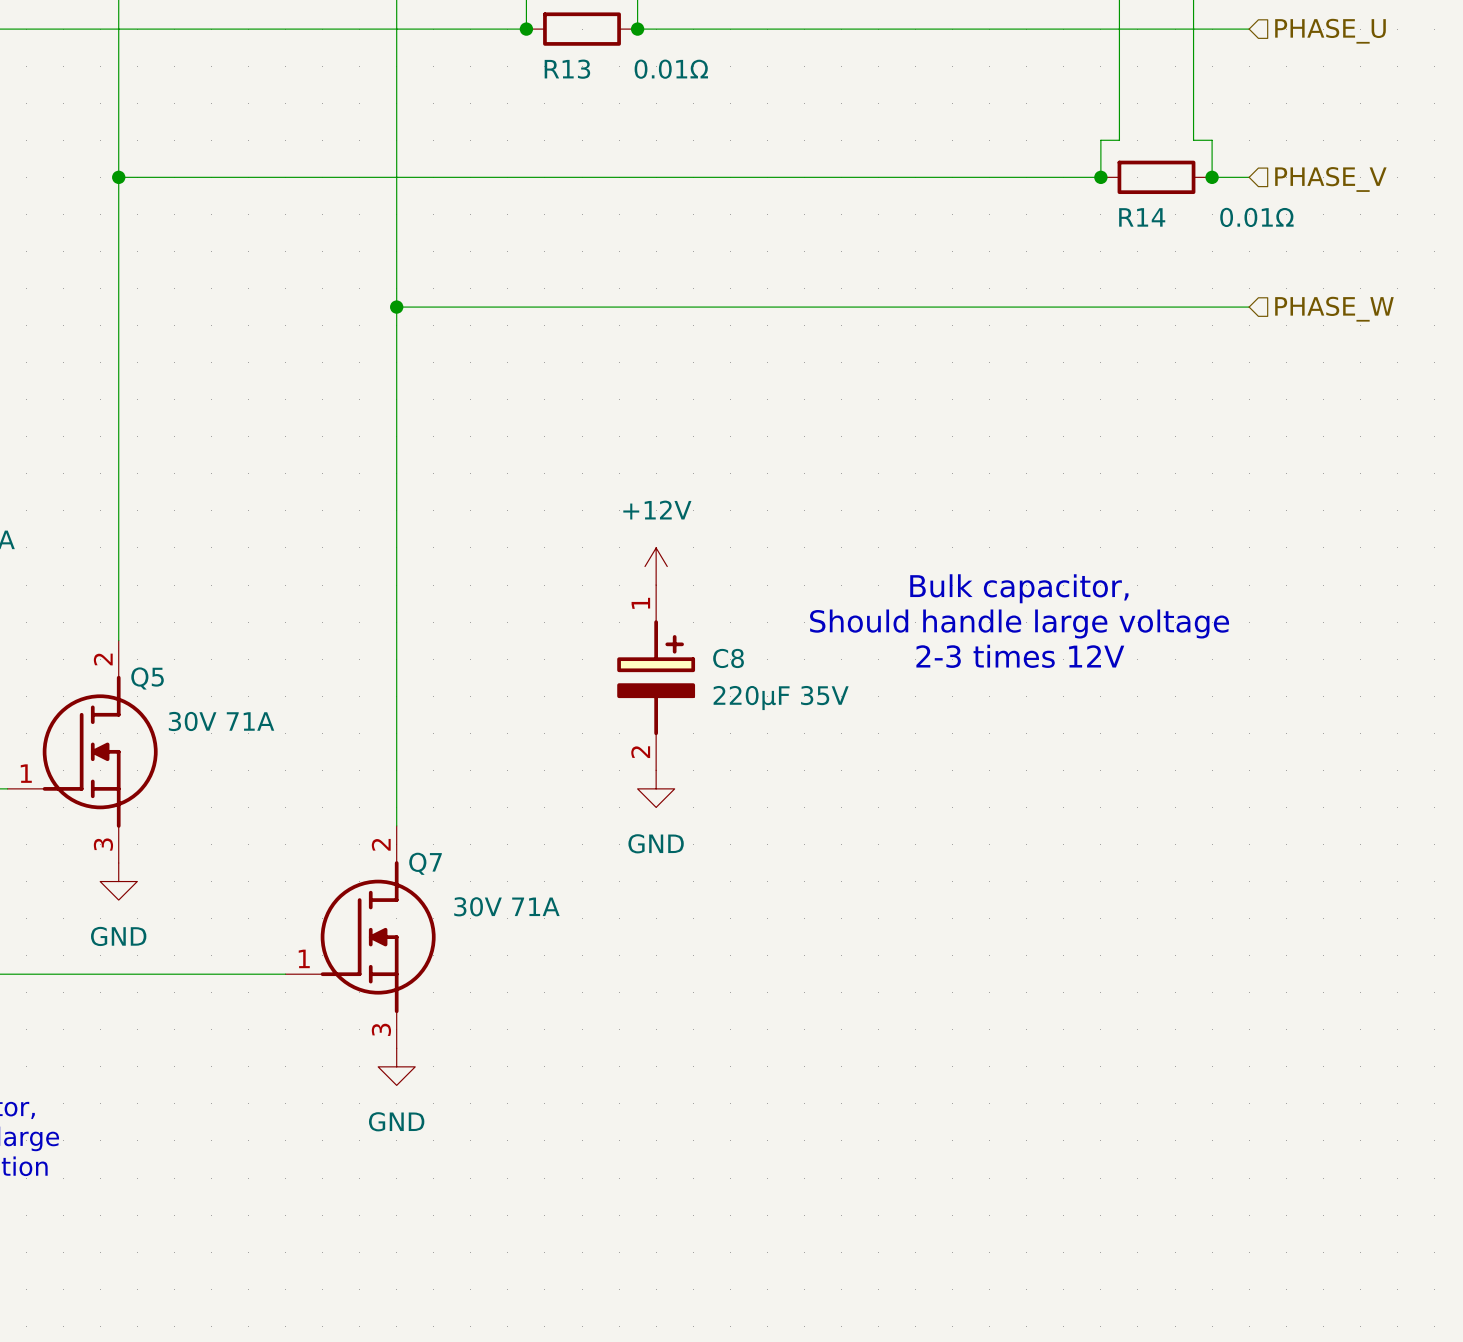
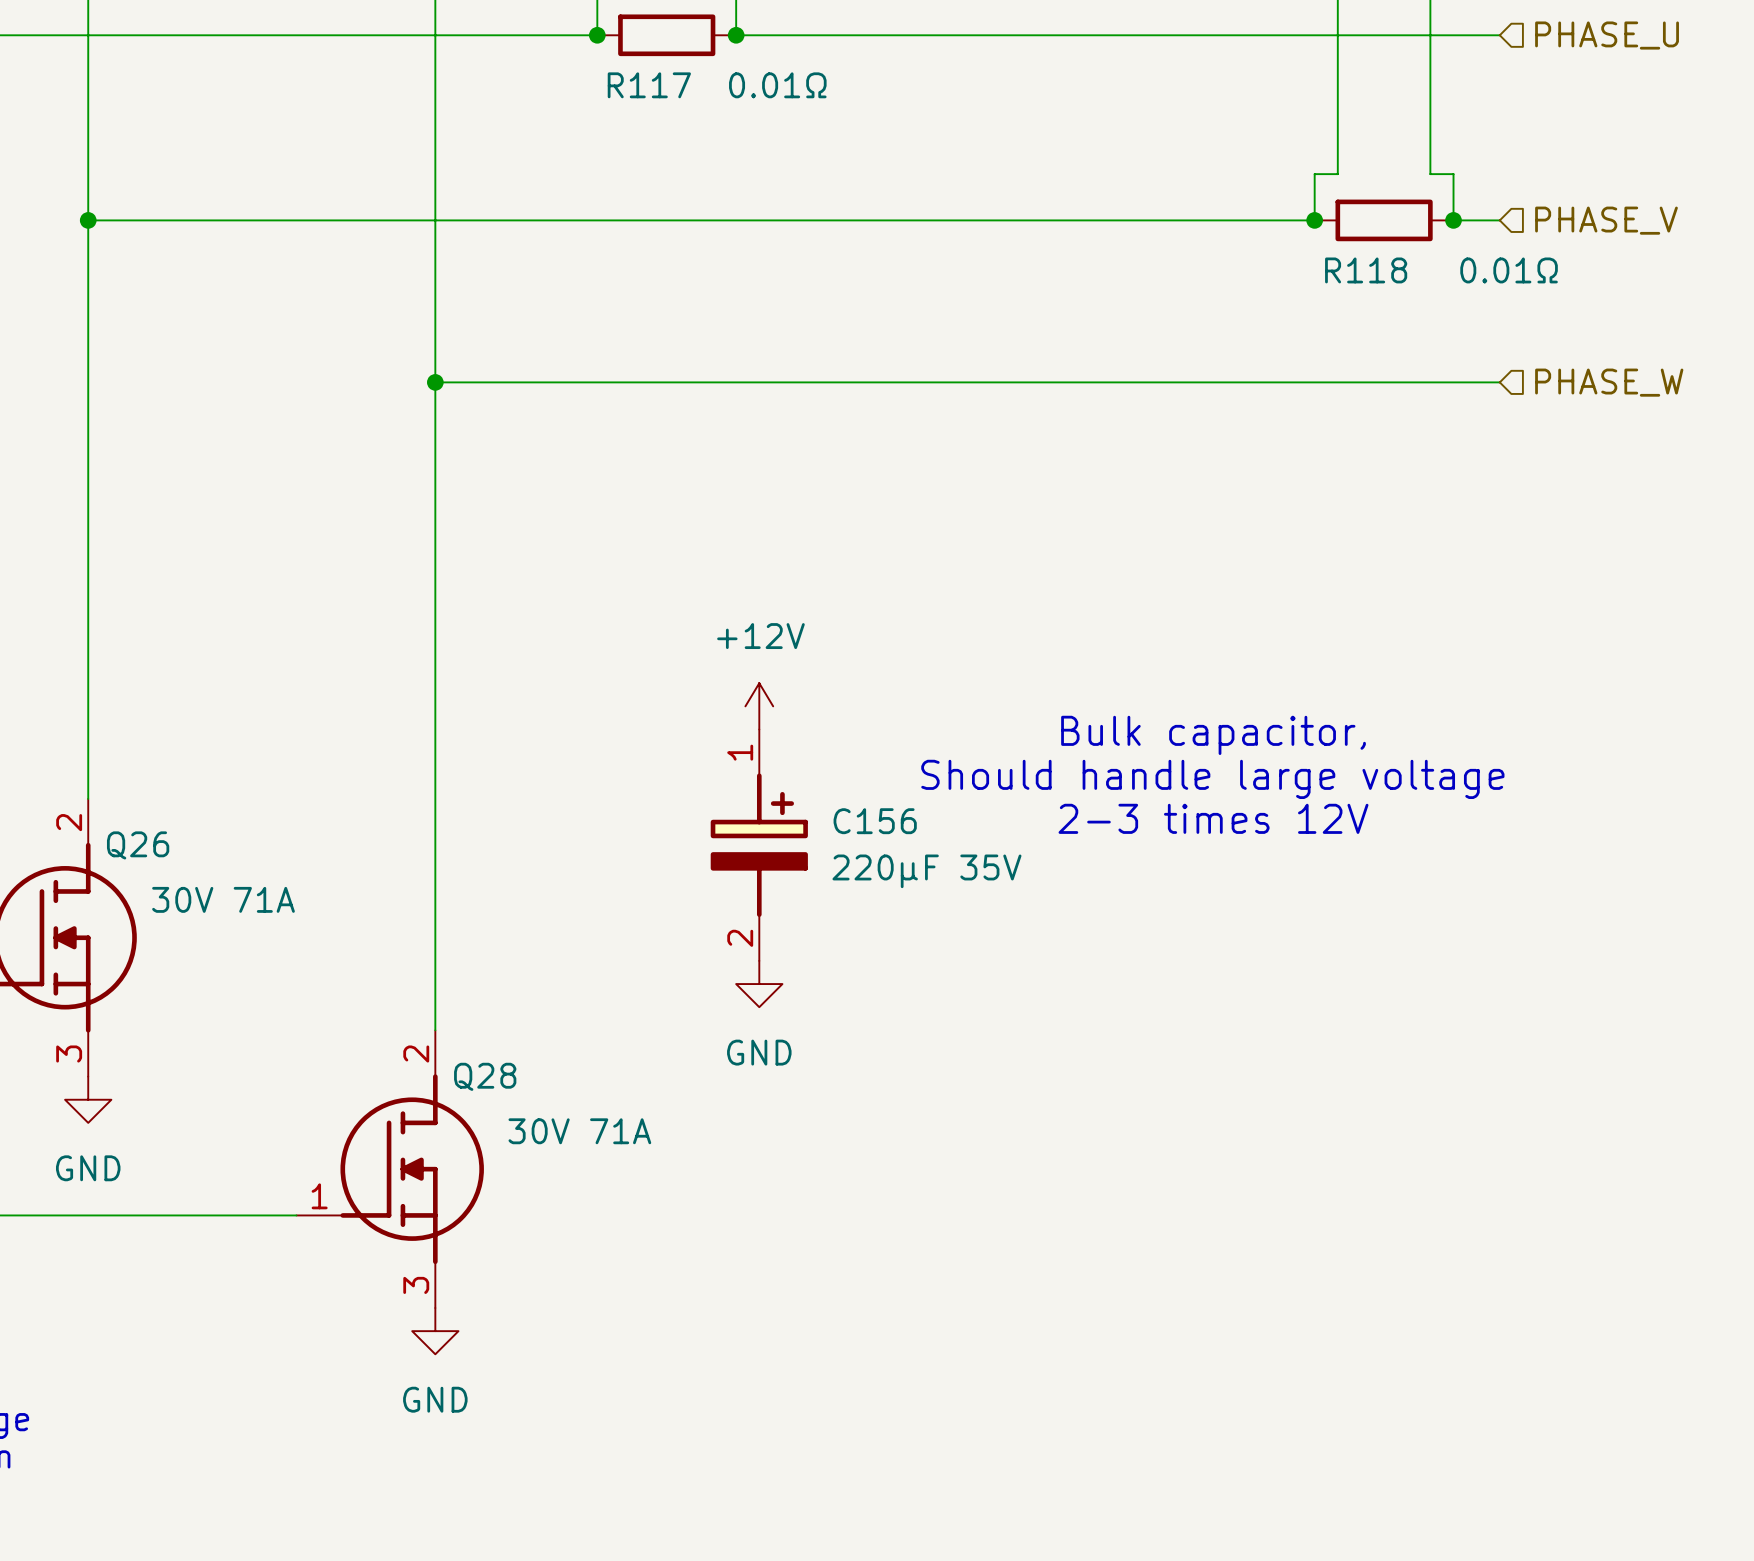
R13 name: R13 (567, 69) -> R117 (649, 85)
R14 name: R14 (1142, 217) -> R118 (1366, 270)
C8 name: C8 (728, 658) -> C156 (875, 821)
Q5 name: Q5 (147, 678) -> Q26 (138, 845)
Q7 name: Q7 (425, 863) -> Q28 (485, 1076)

